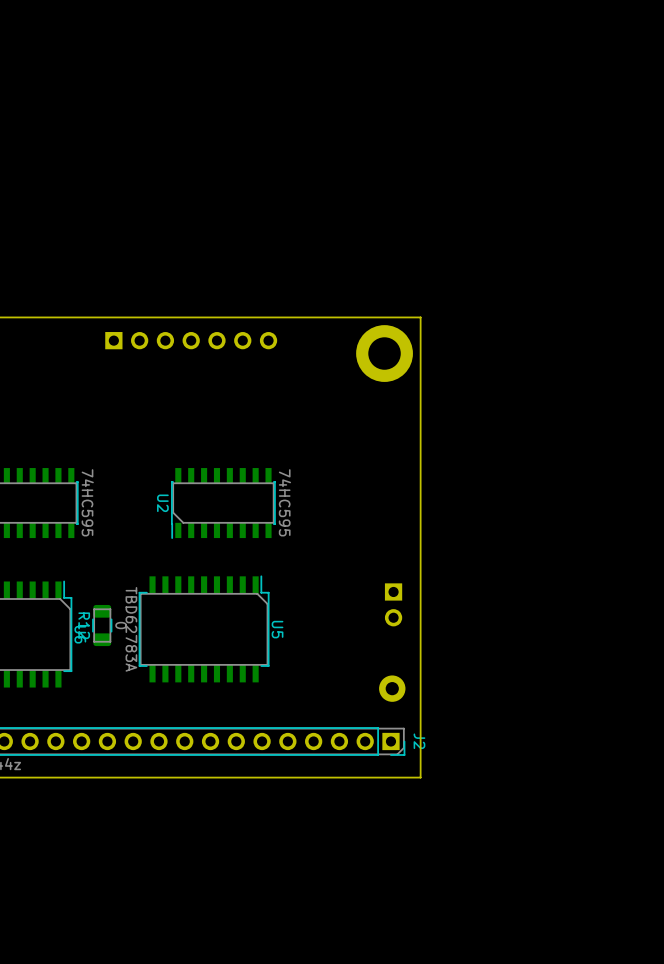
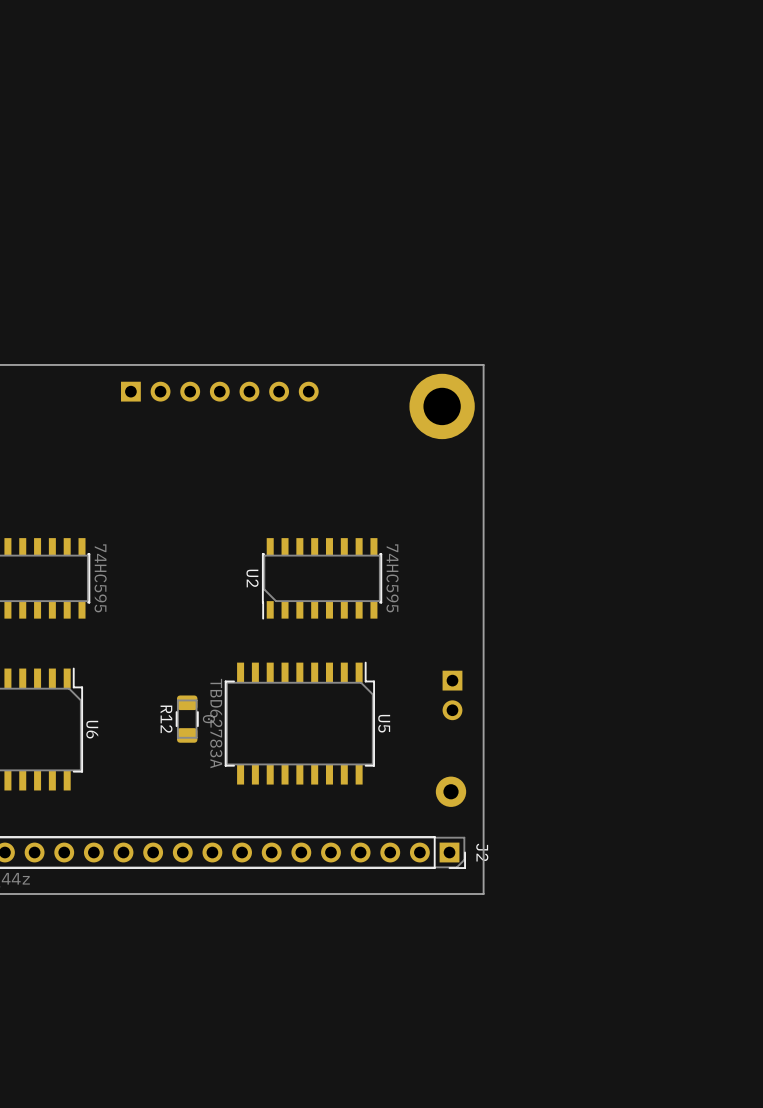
U2 position: (223, 503) -> (322, 578)
R12 position: (102, 625) -> (187, 719)
U5 position: (204, 629) -> (299, 723)

